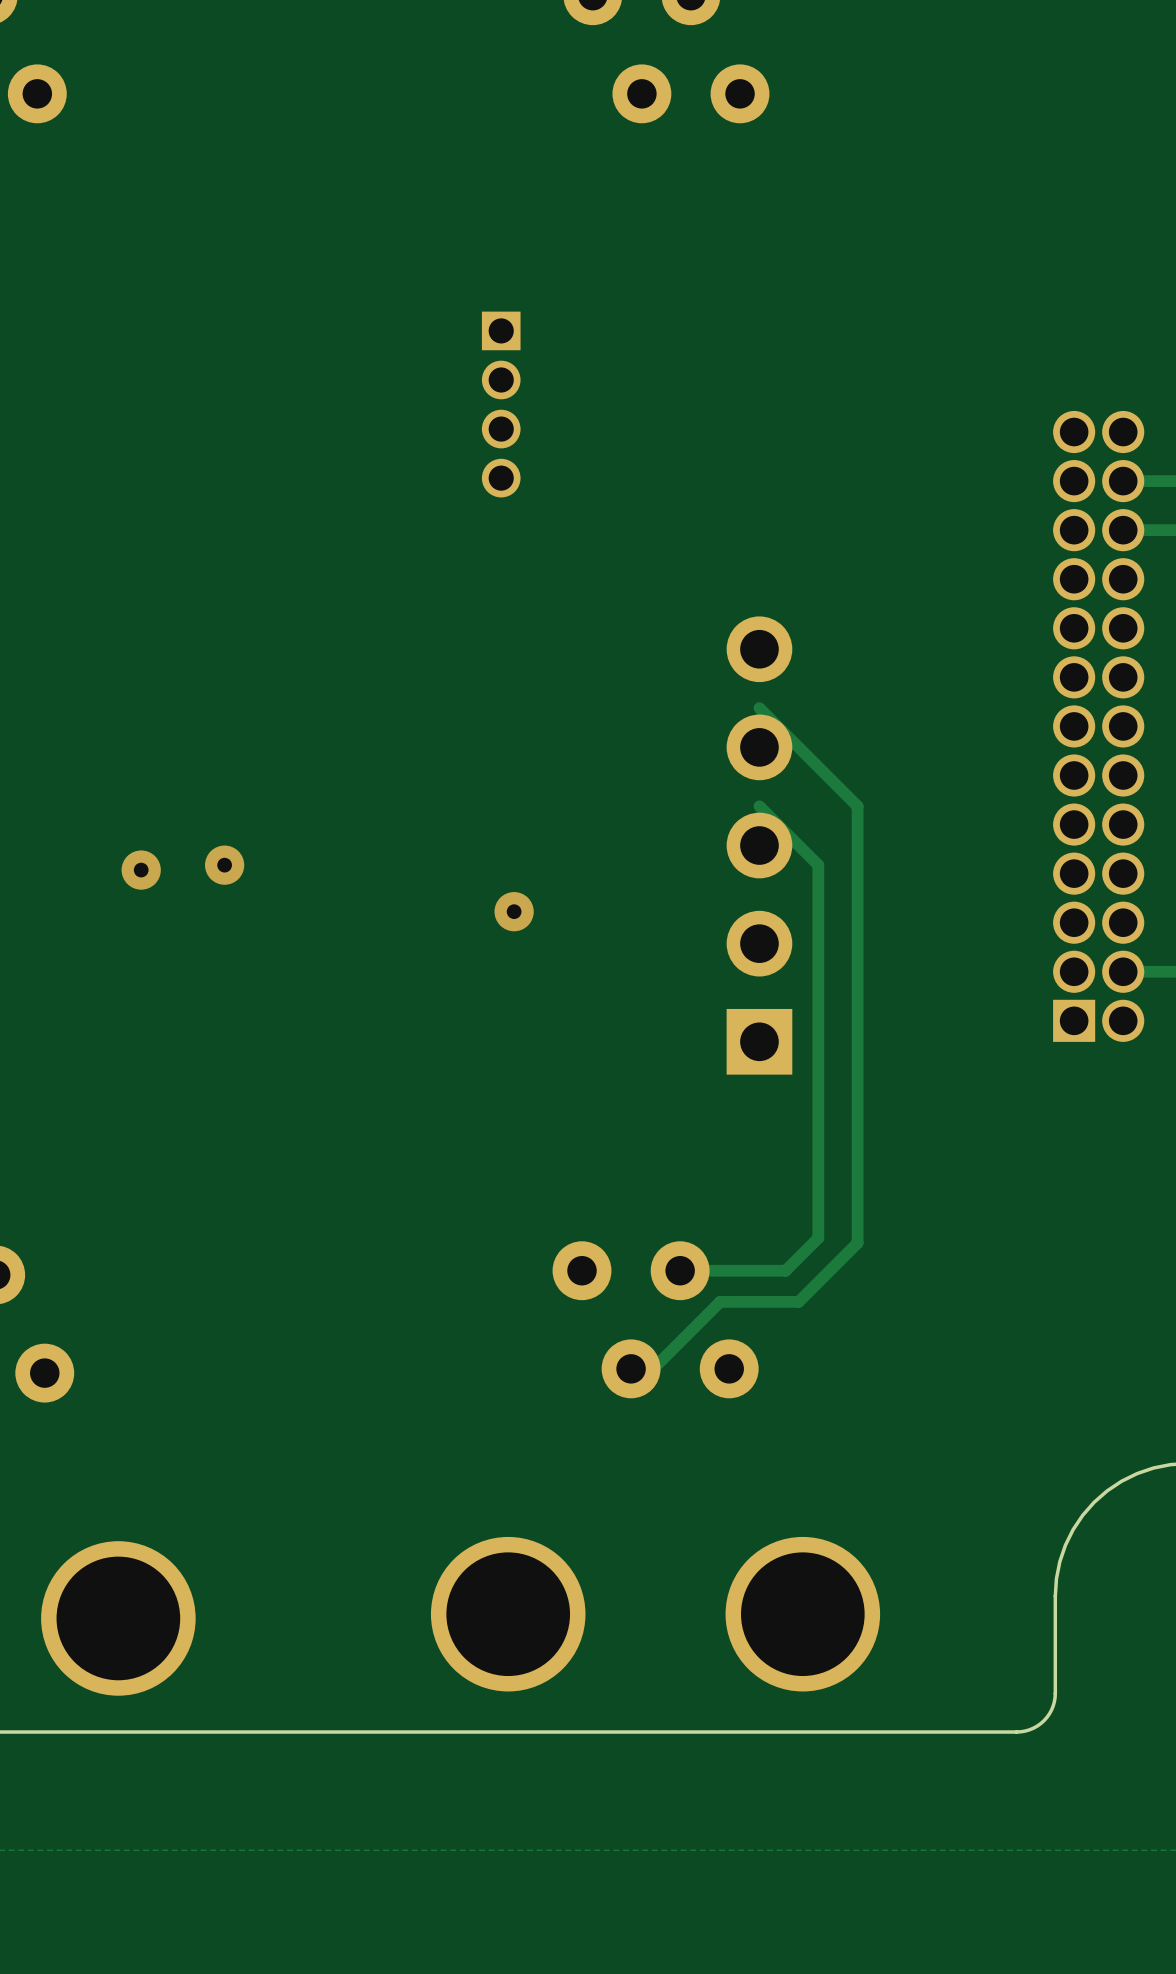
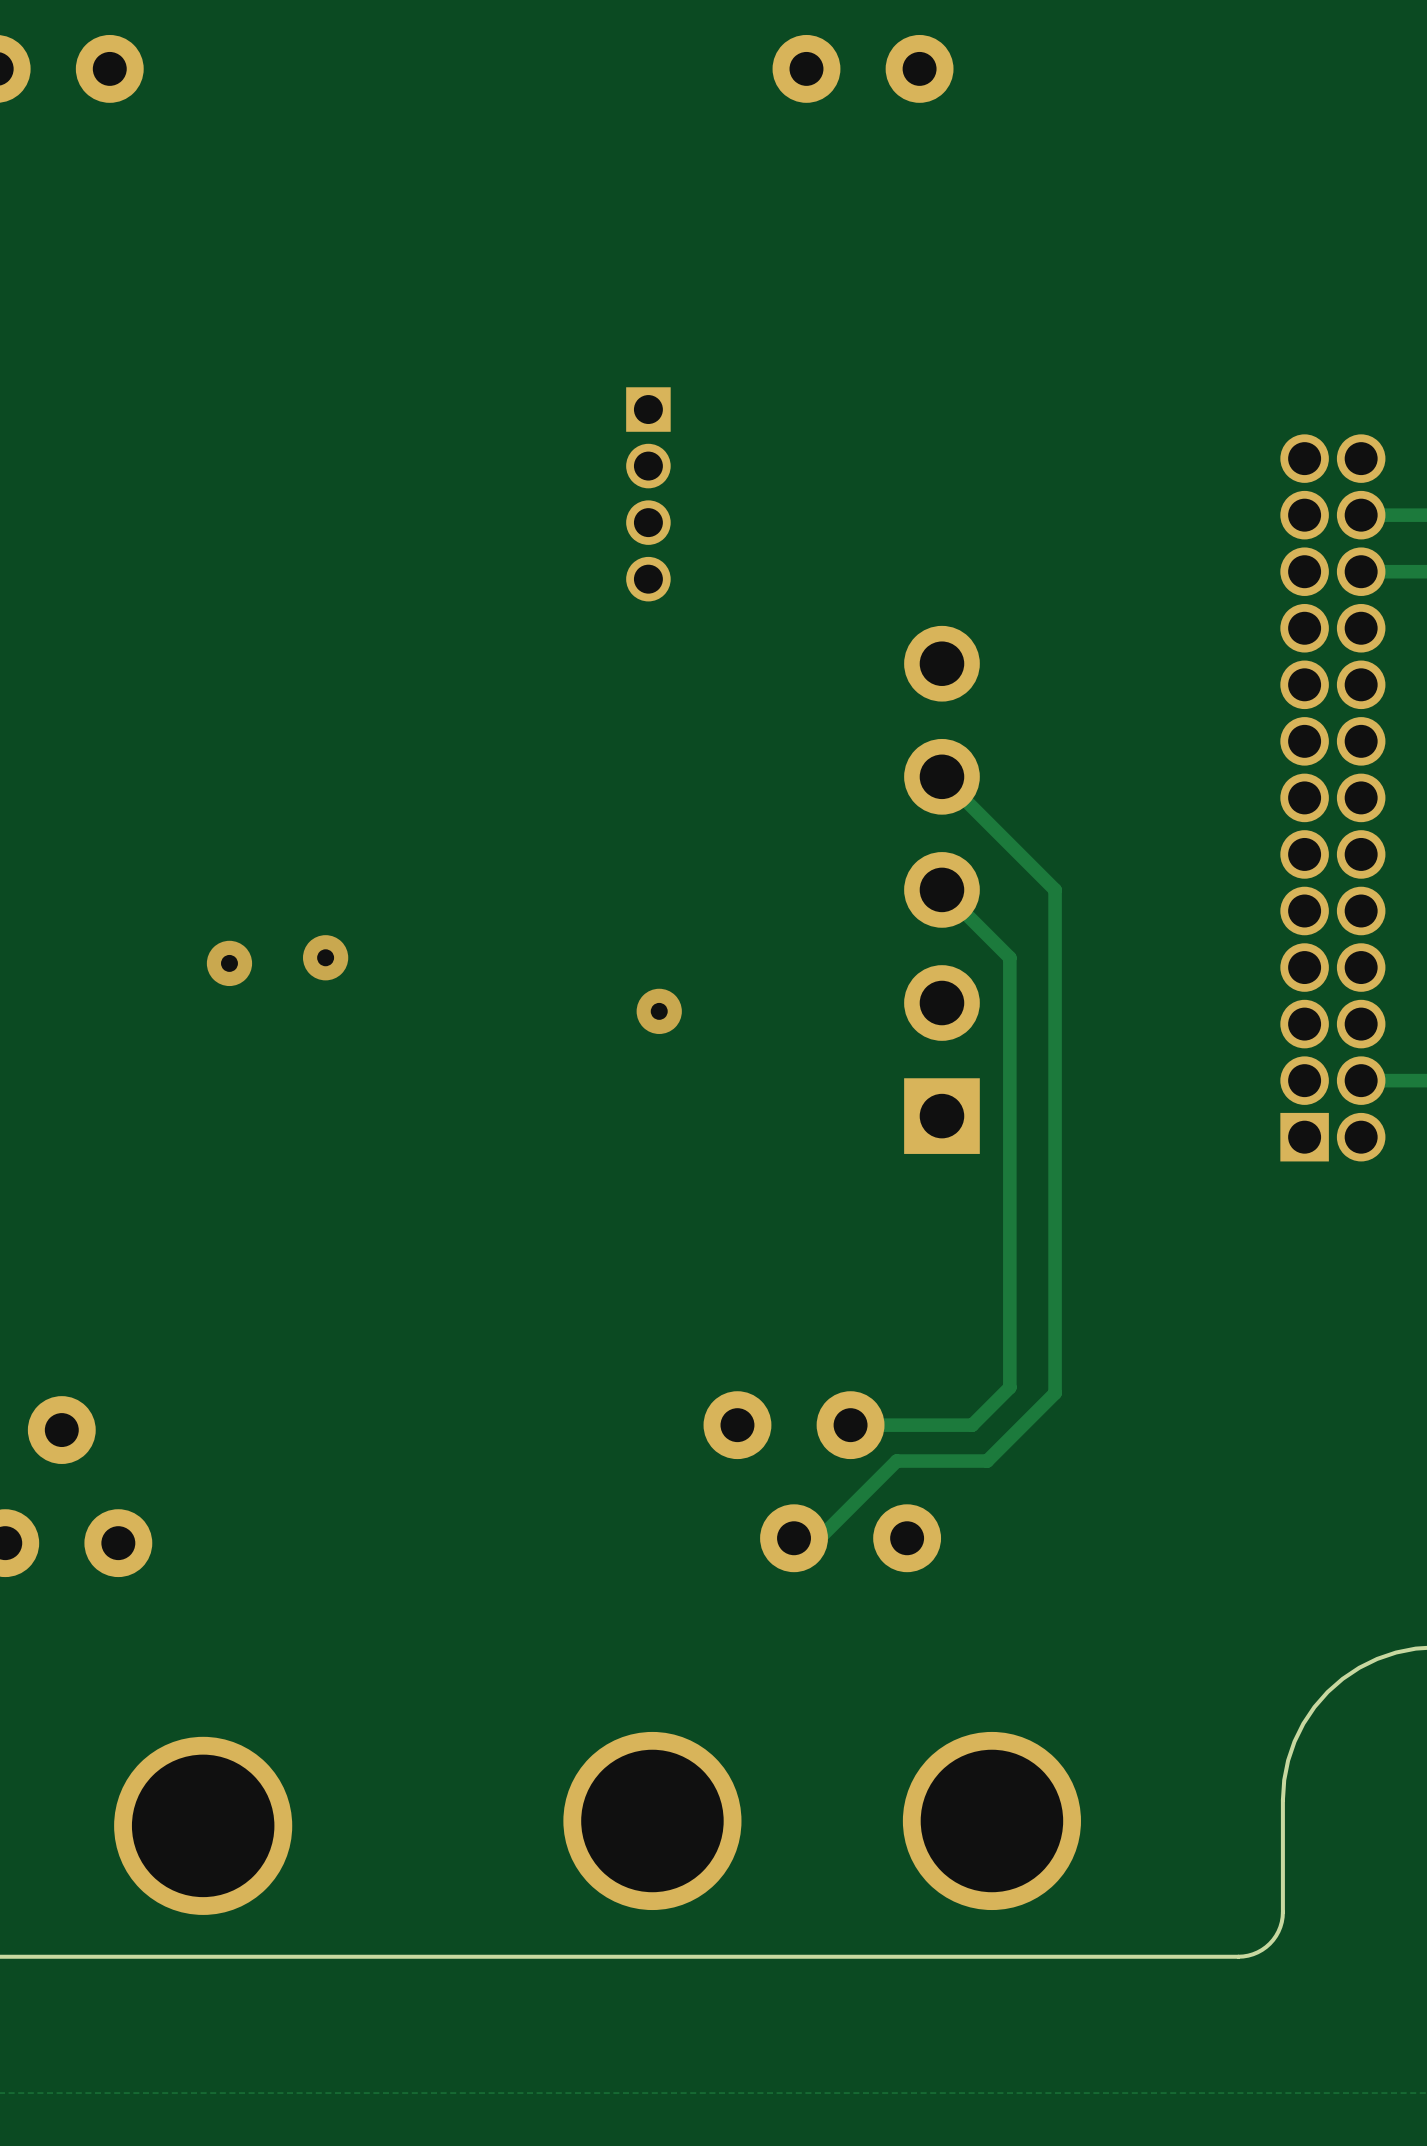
part position: (501, 404) -> (648, 494)
part position: (759, 845) -> (941, 889)

